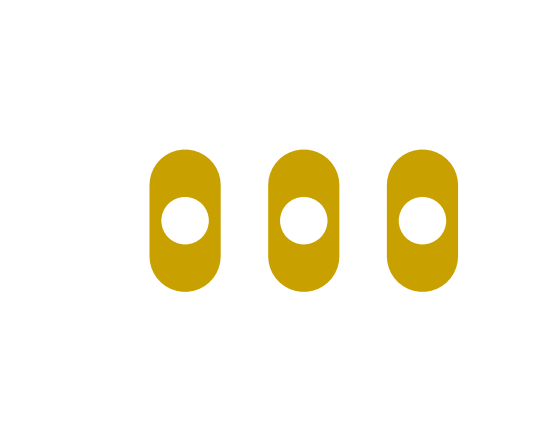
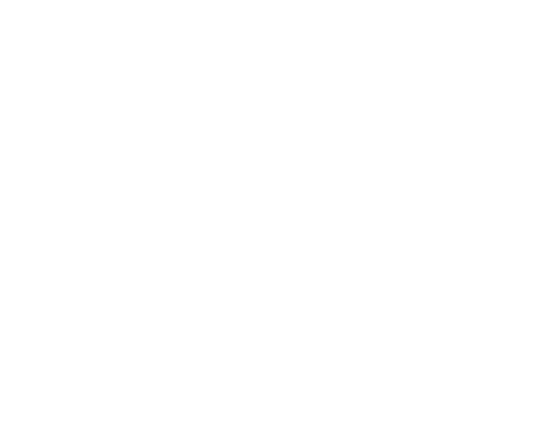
part: (303, 220) -> none

